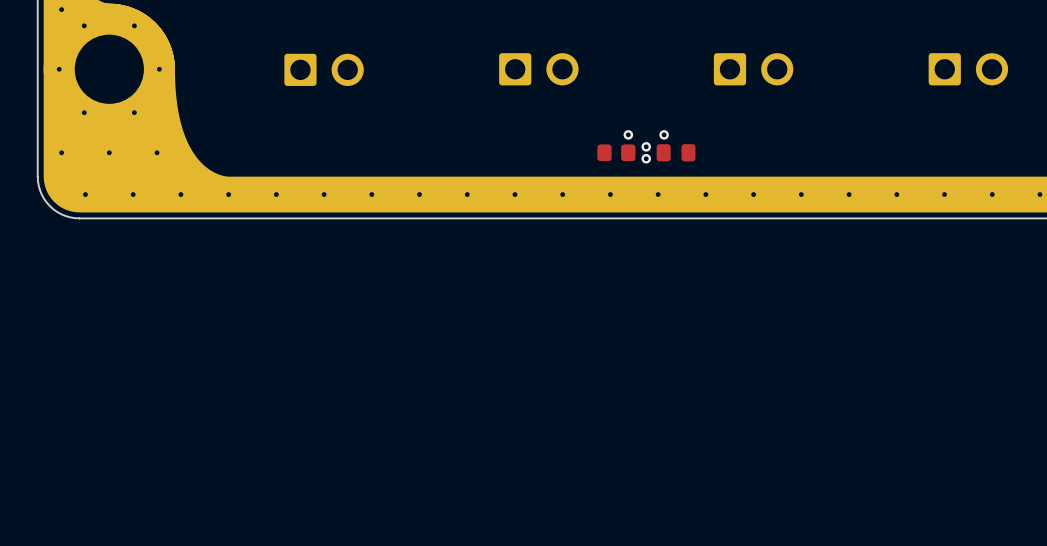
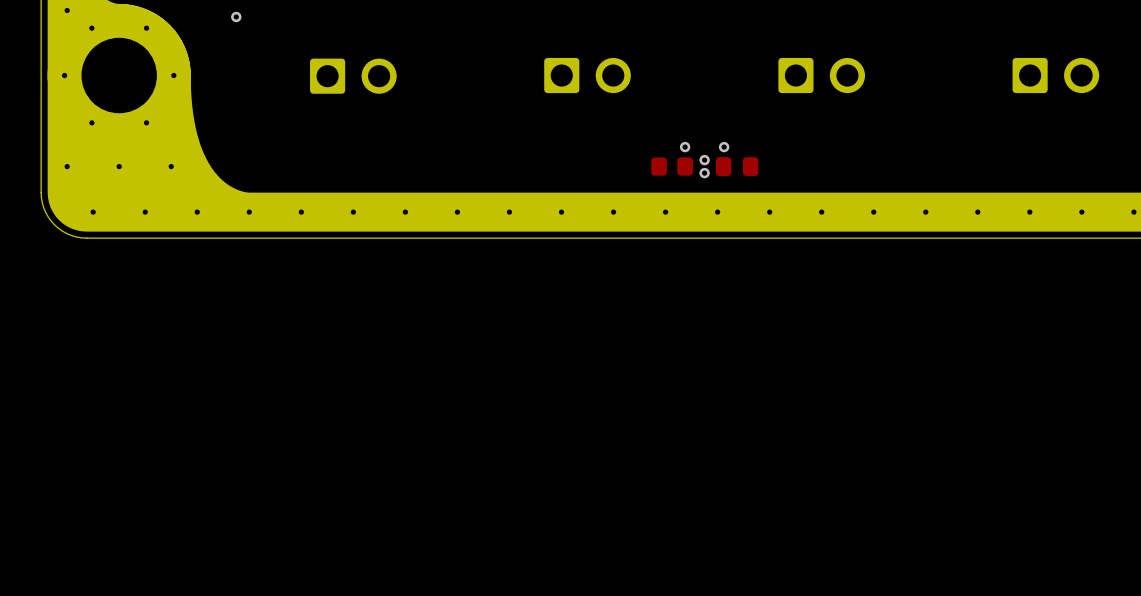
via: none -> (236, 16)

